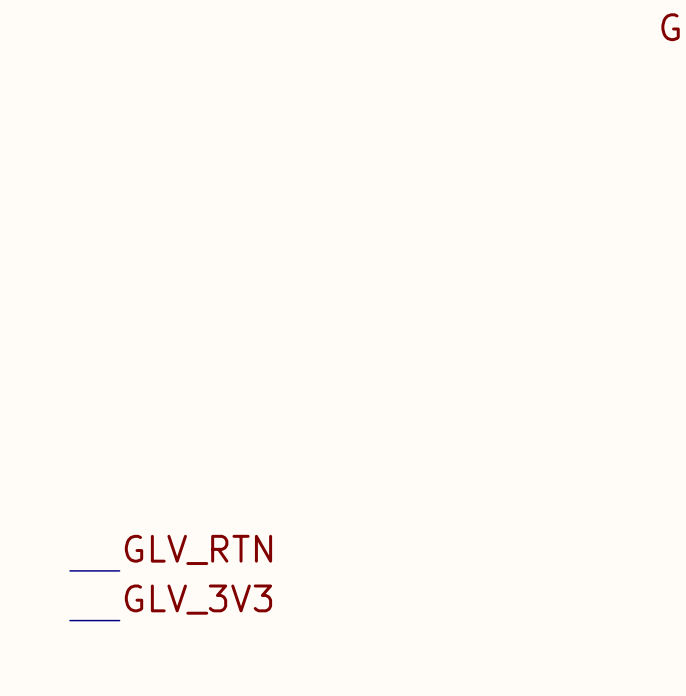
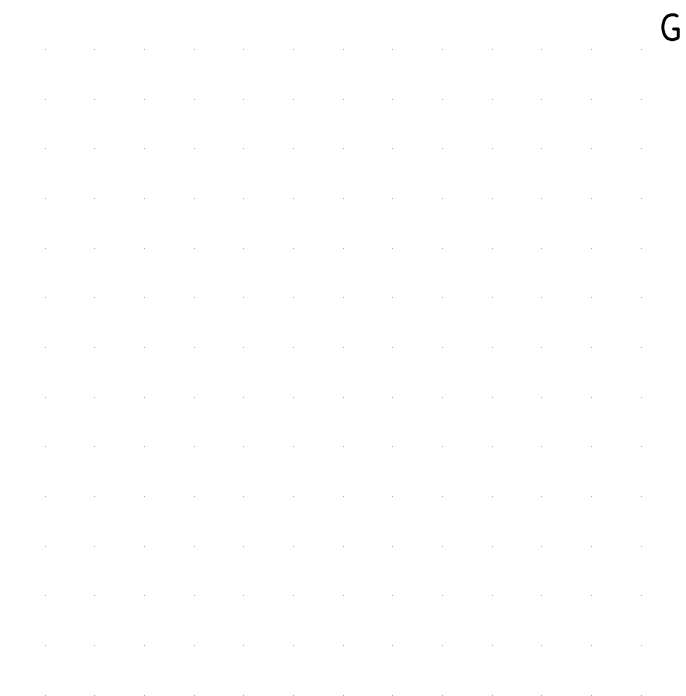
label: GLV_RTN (198, 549) -> none
wire: (69, 570) (119, 570) -> none
label: GLV_3V3 (198, 599) -> none
wire: (69, 620) (119, 620) -> none

